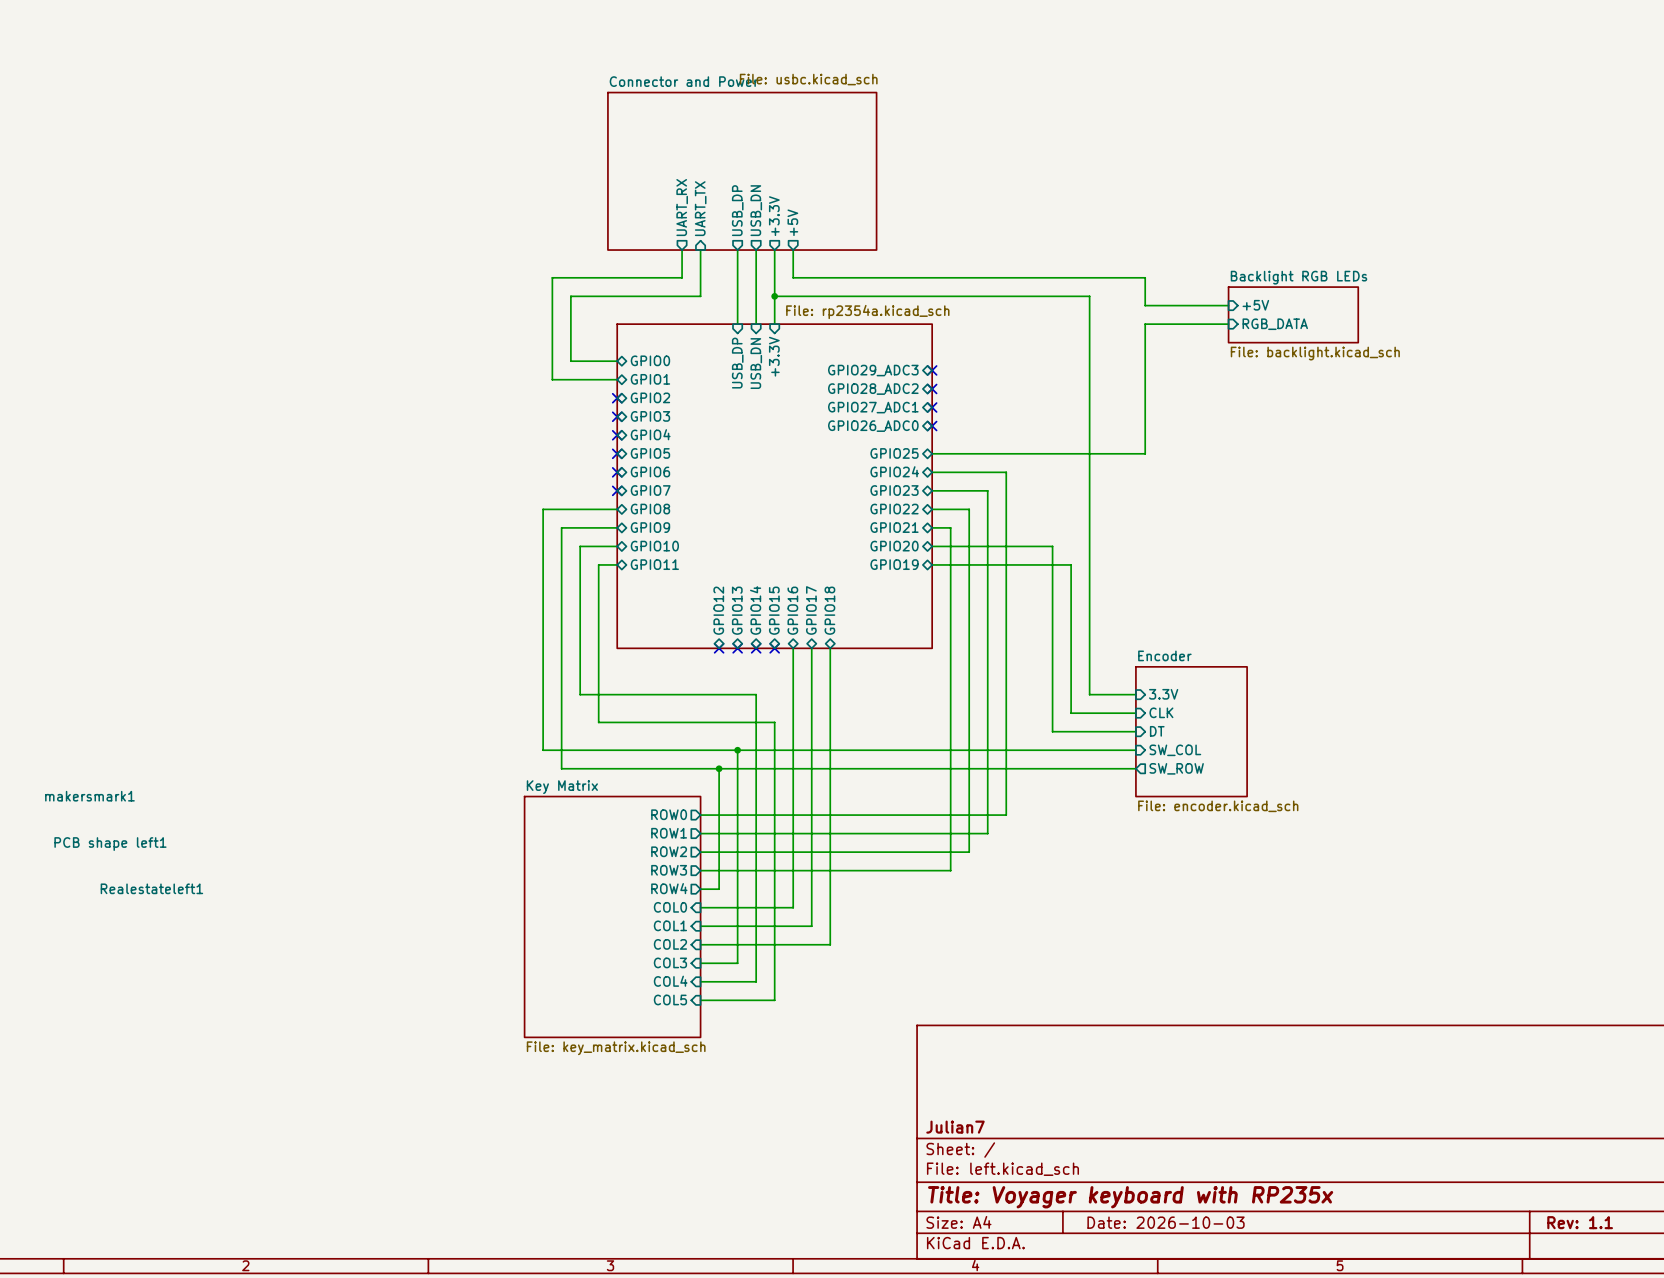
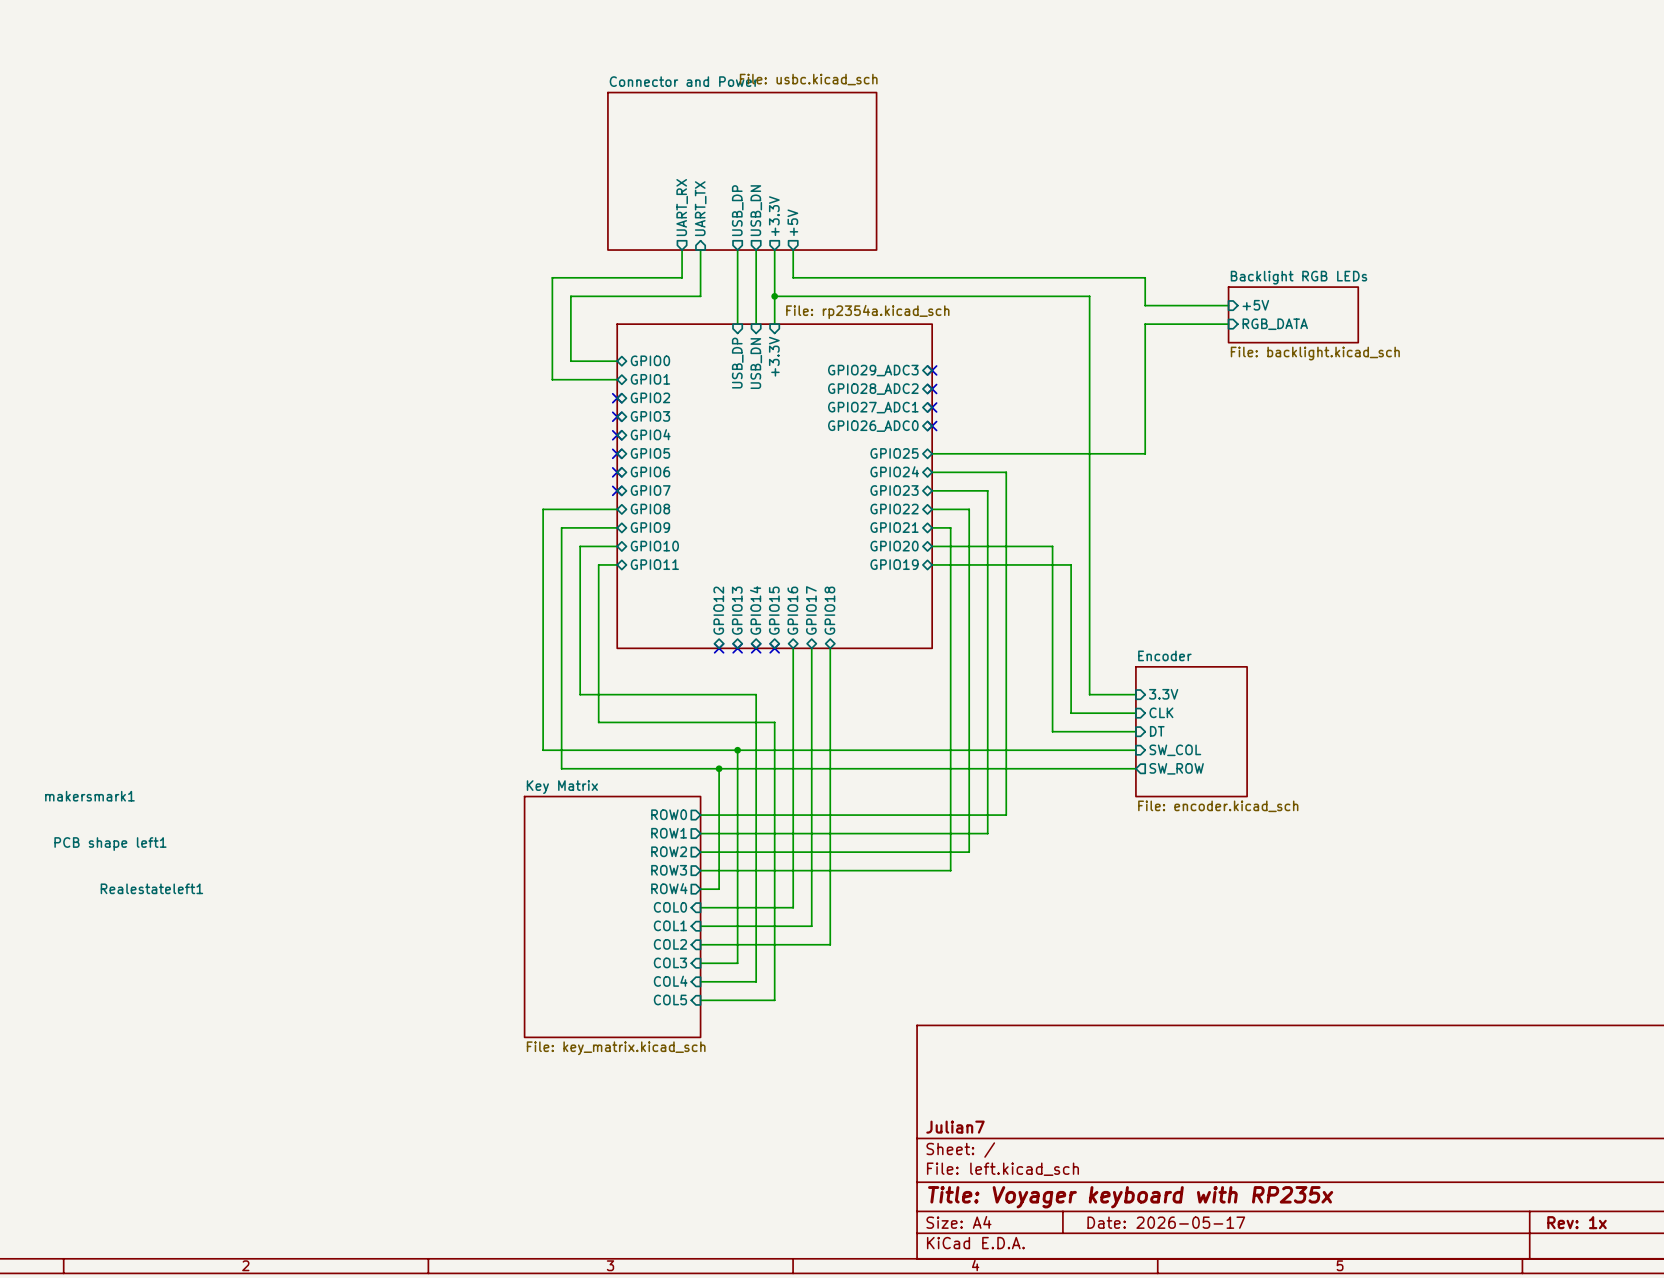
title block: Date: 2026-10-03 (1166, 1222) -> Date: 2026-05-17 (1166, 1222)
title block: Rev: 1.1 (1580, 1222) -> Rev: 1x (1577, 1222)

